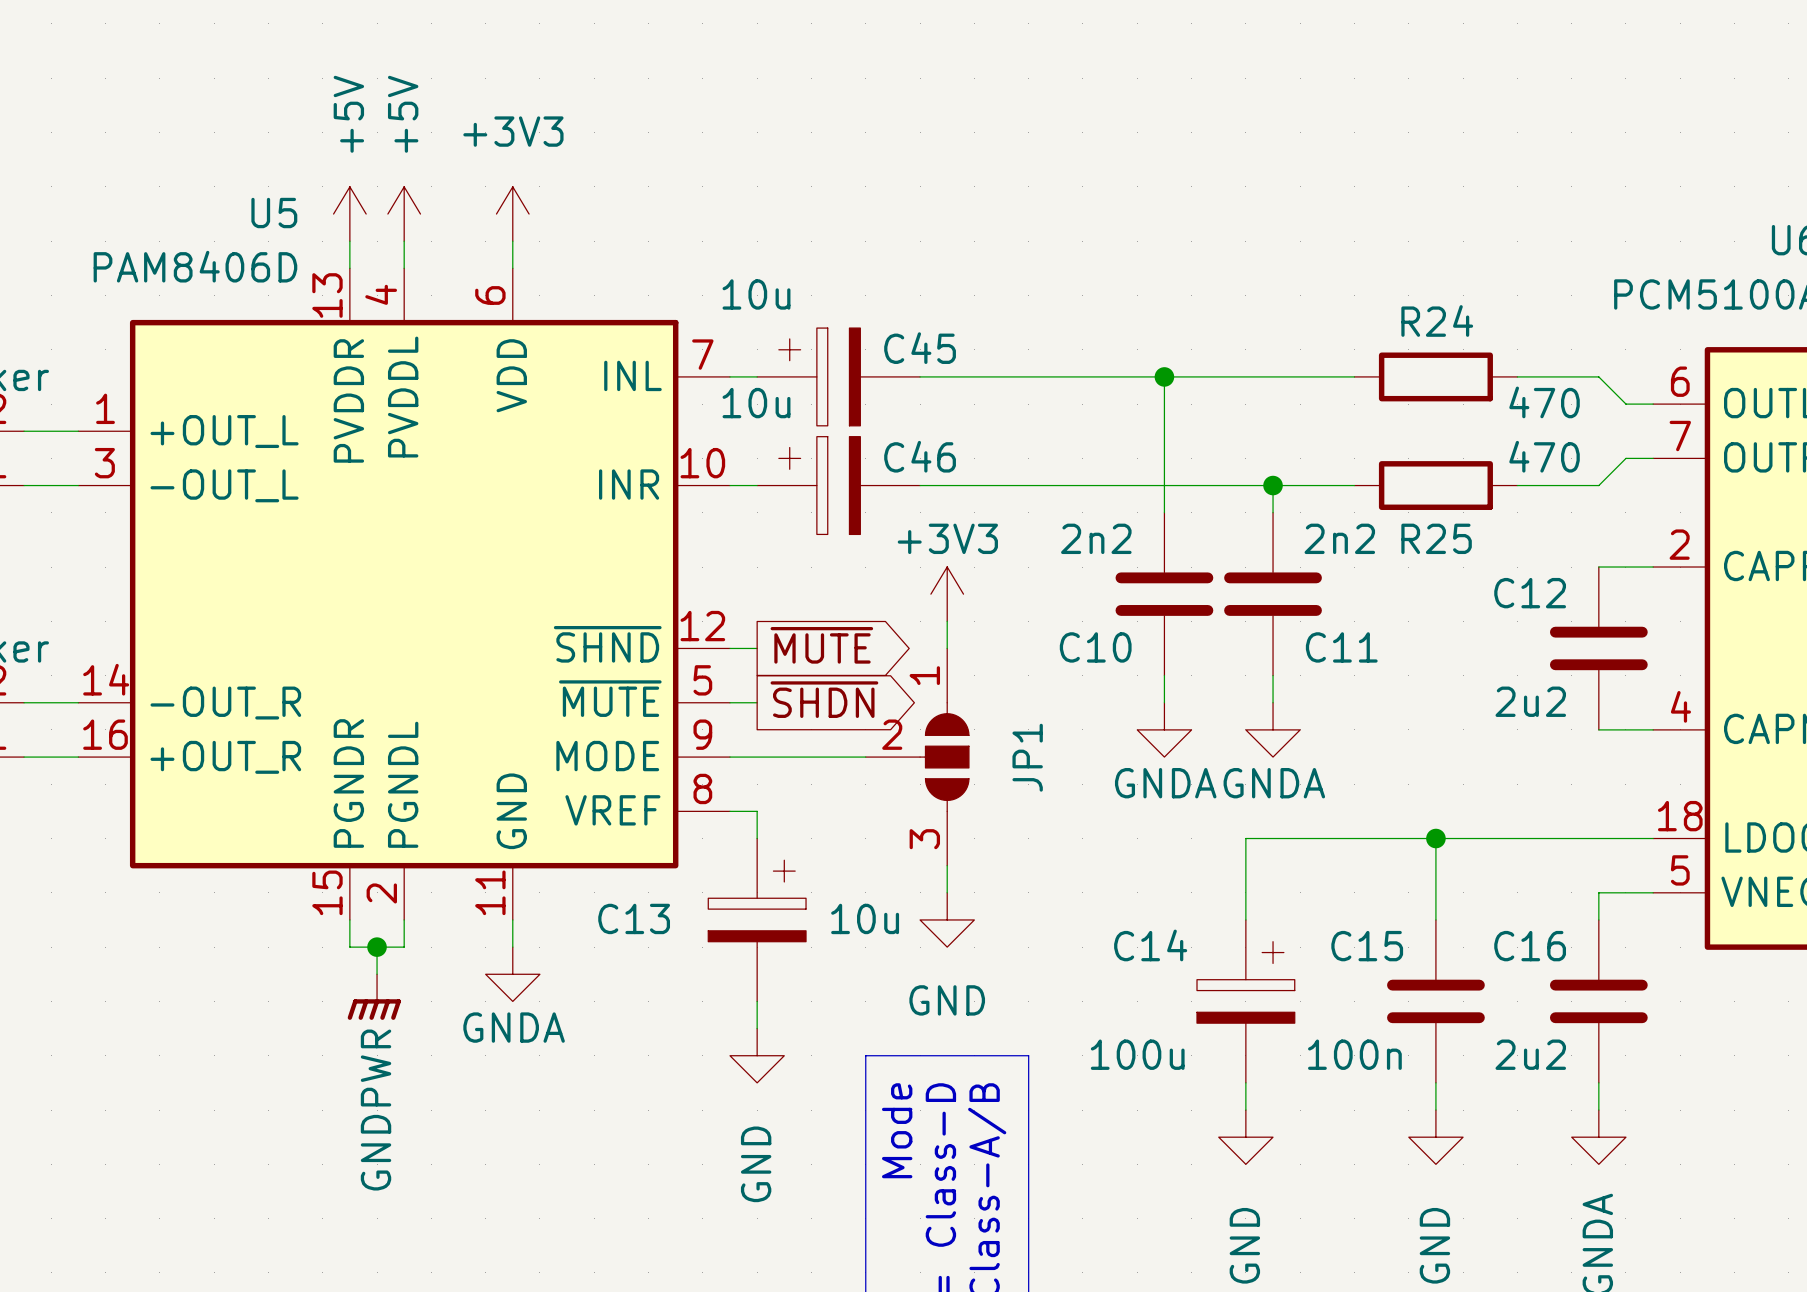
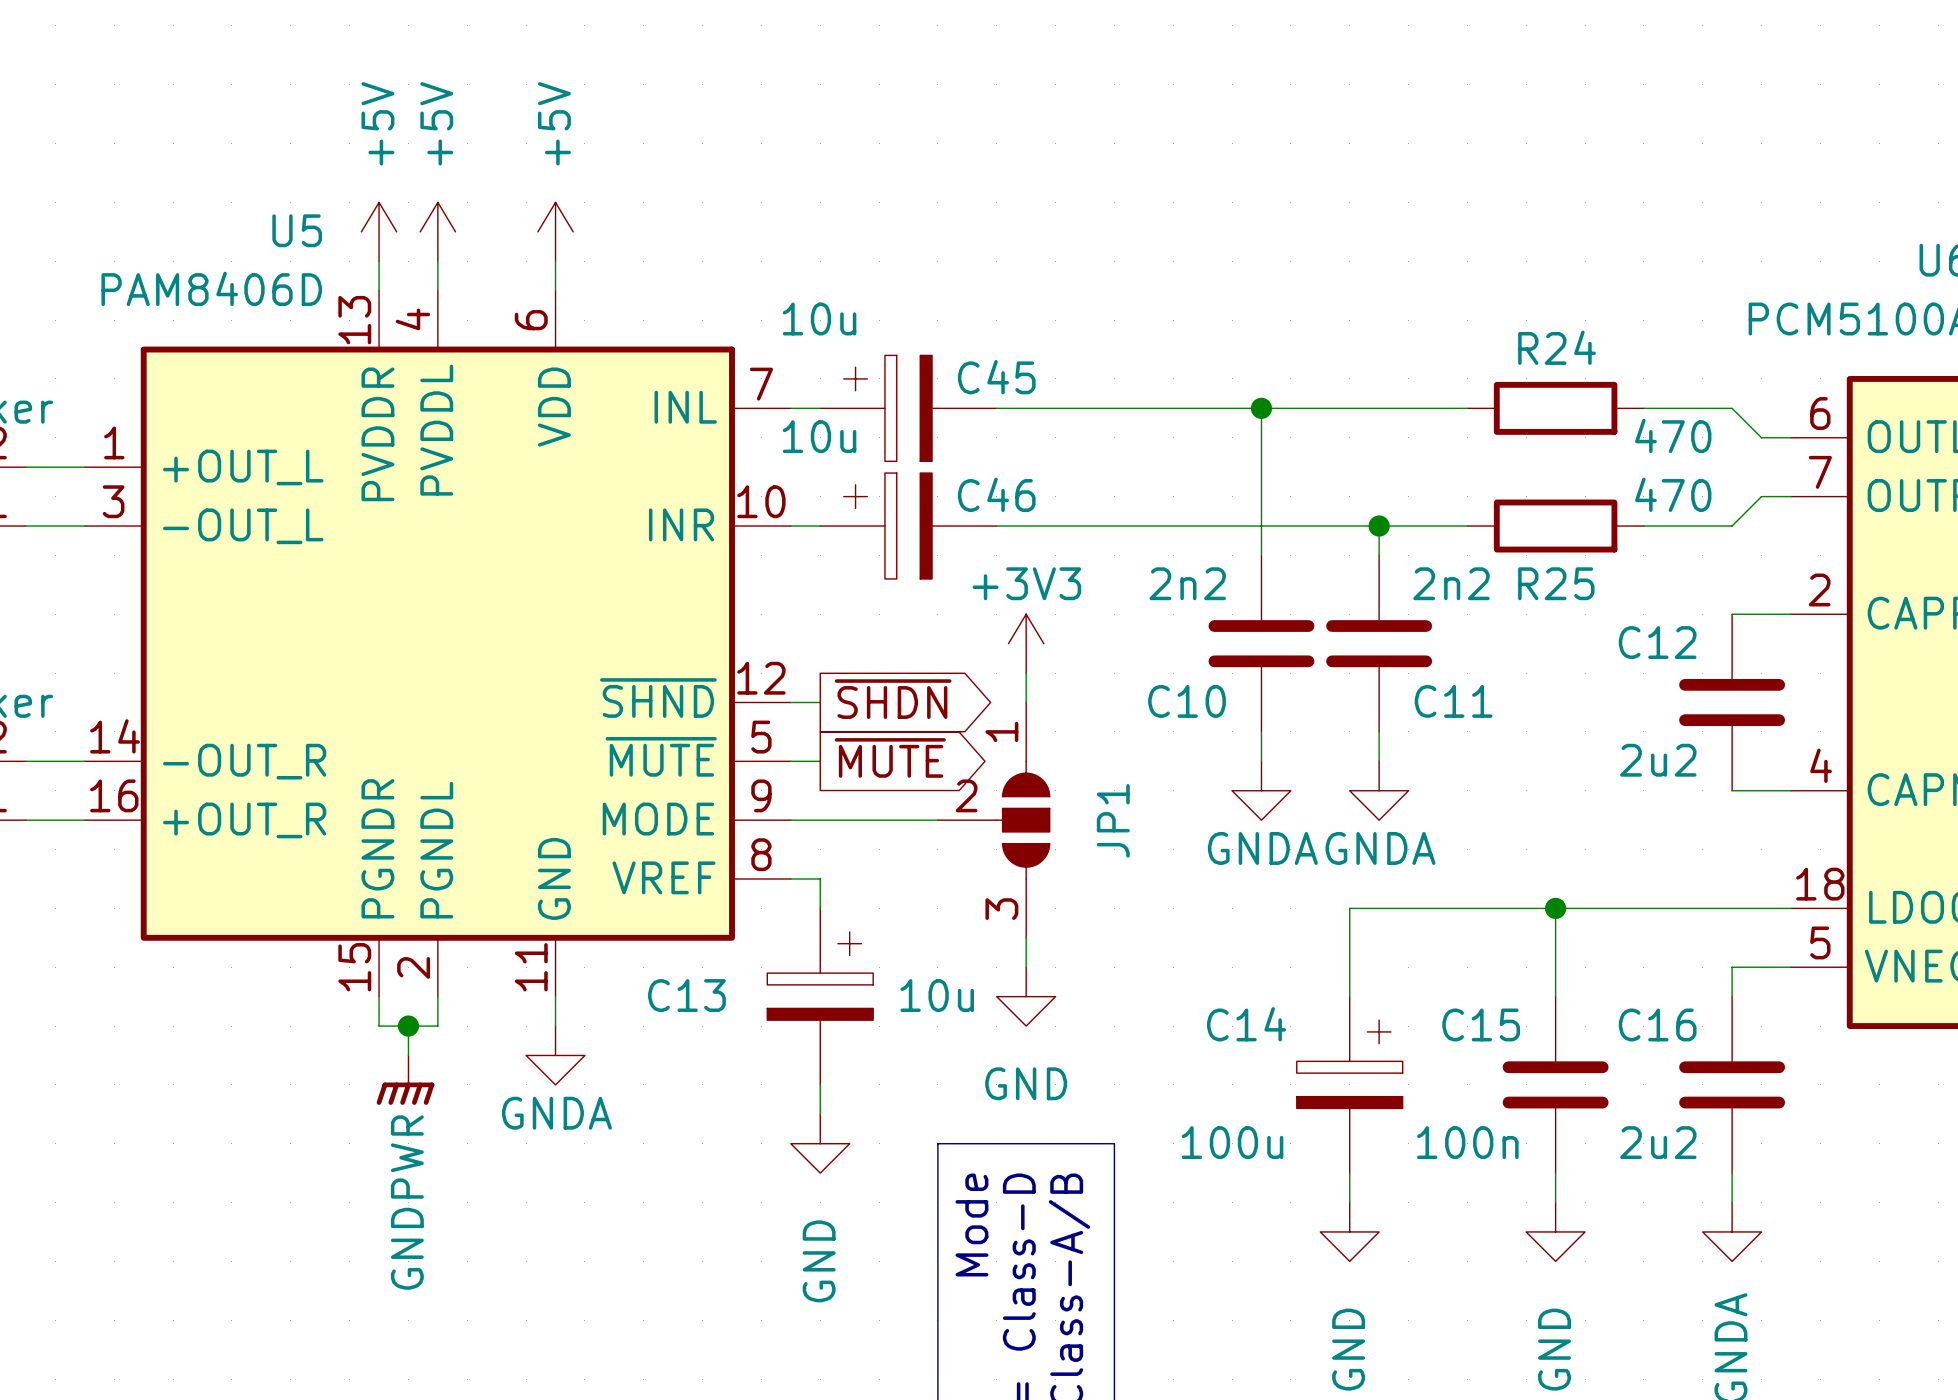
power symbol: +3V3 (512, 214) -> +5V (555, 231)
global label: ~{MUTE} (821, 645) -> ~{SHDN} (893, 699)
global label: ~{SHDN} (824, 699) -> ~{MUTE} (890, 757)

